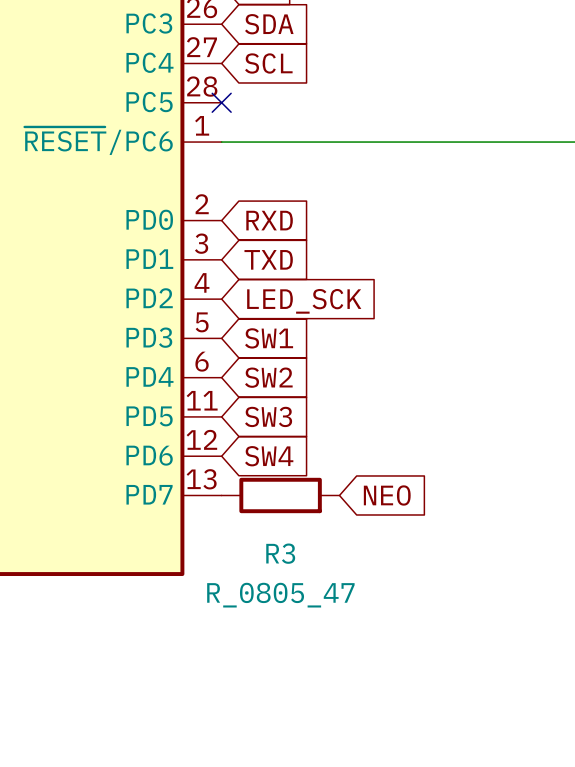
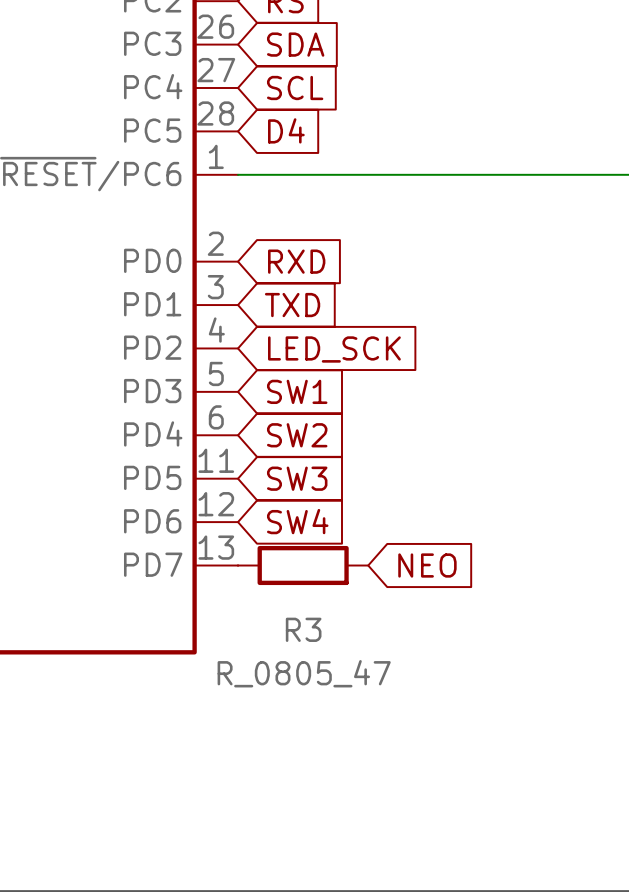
no-connect mark: (221, 102) -> none
global label: none -> D4 (286, 130)

